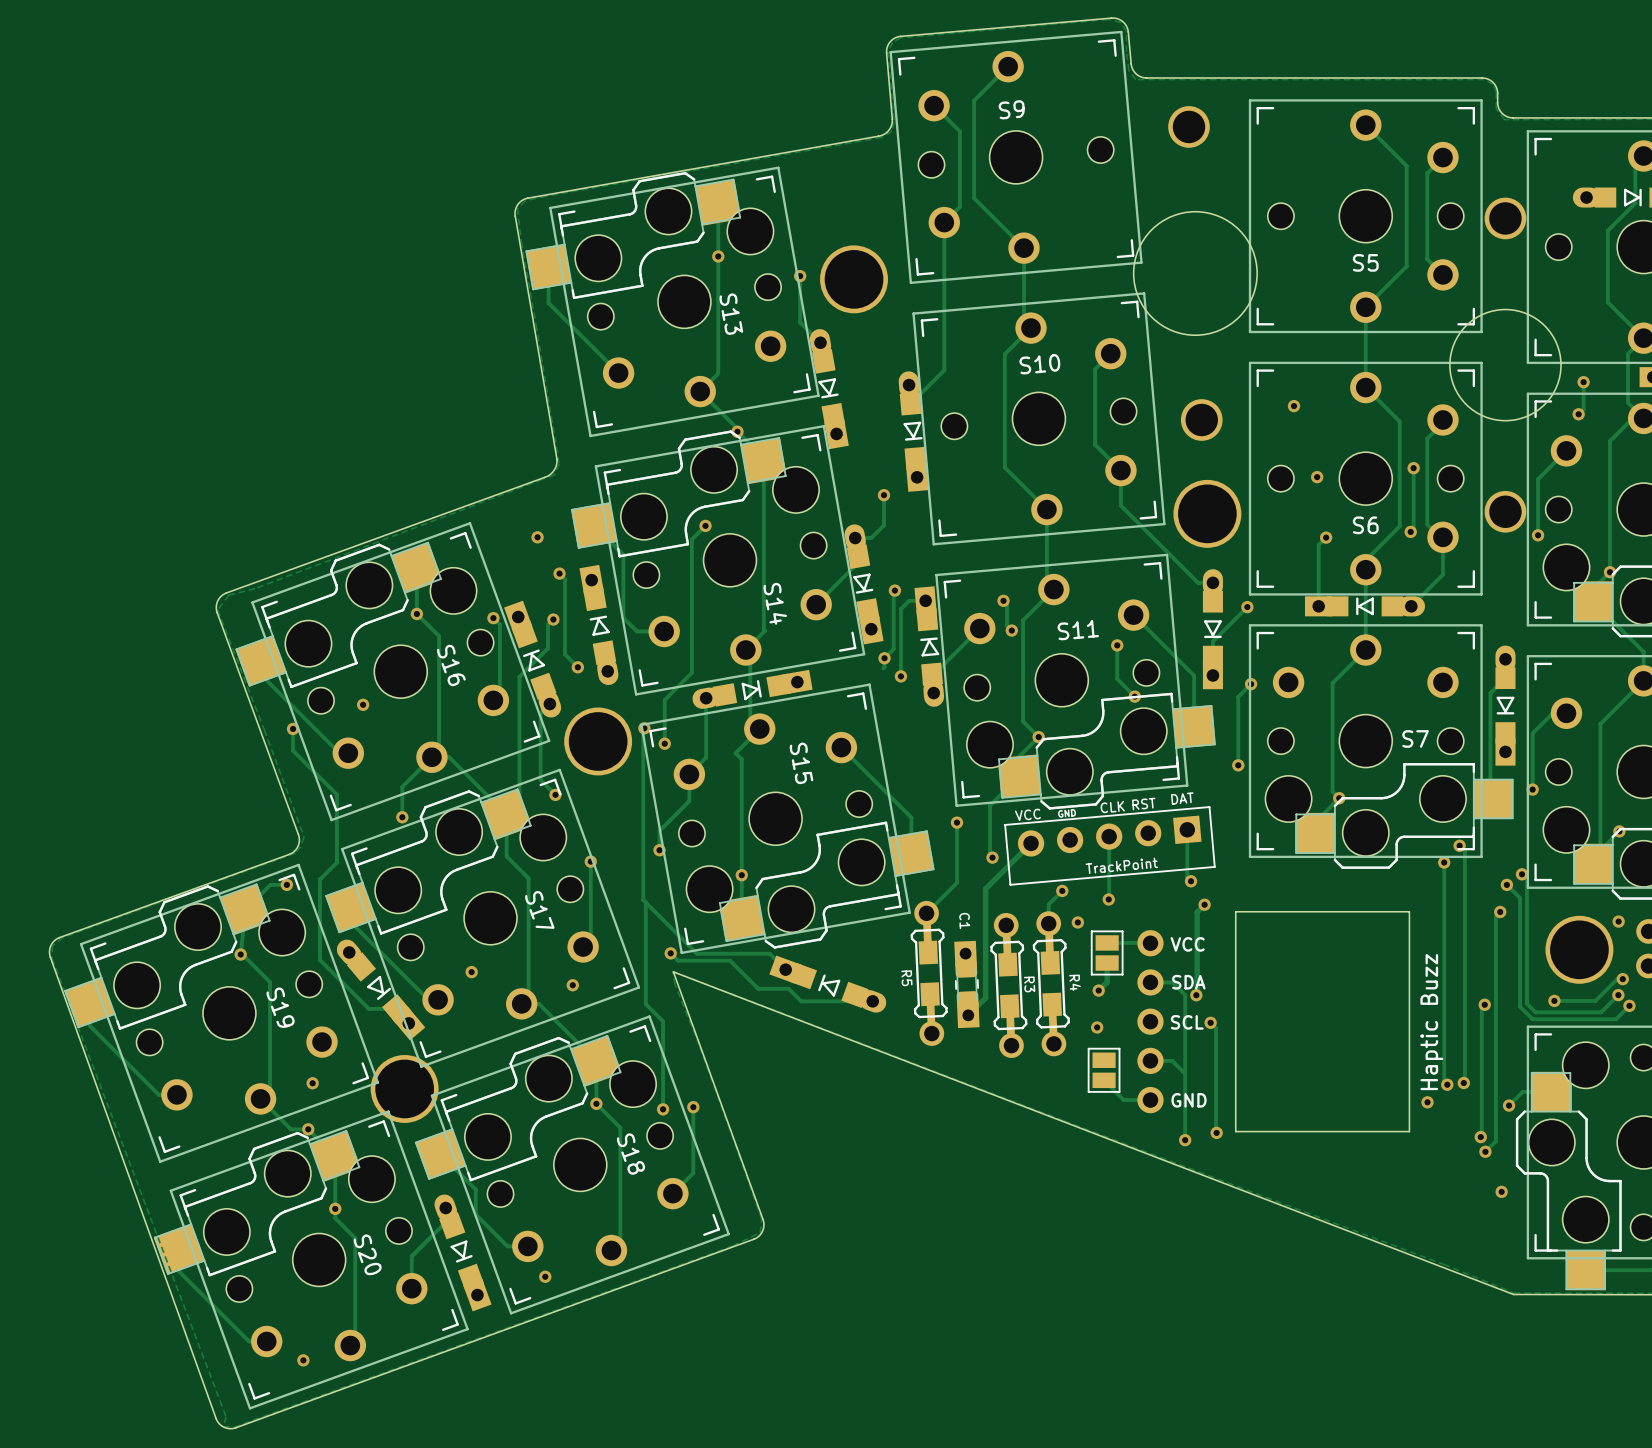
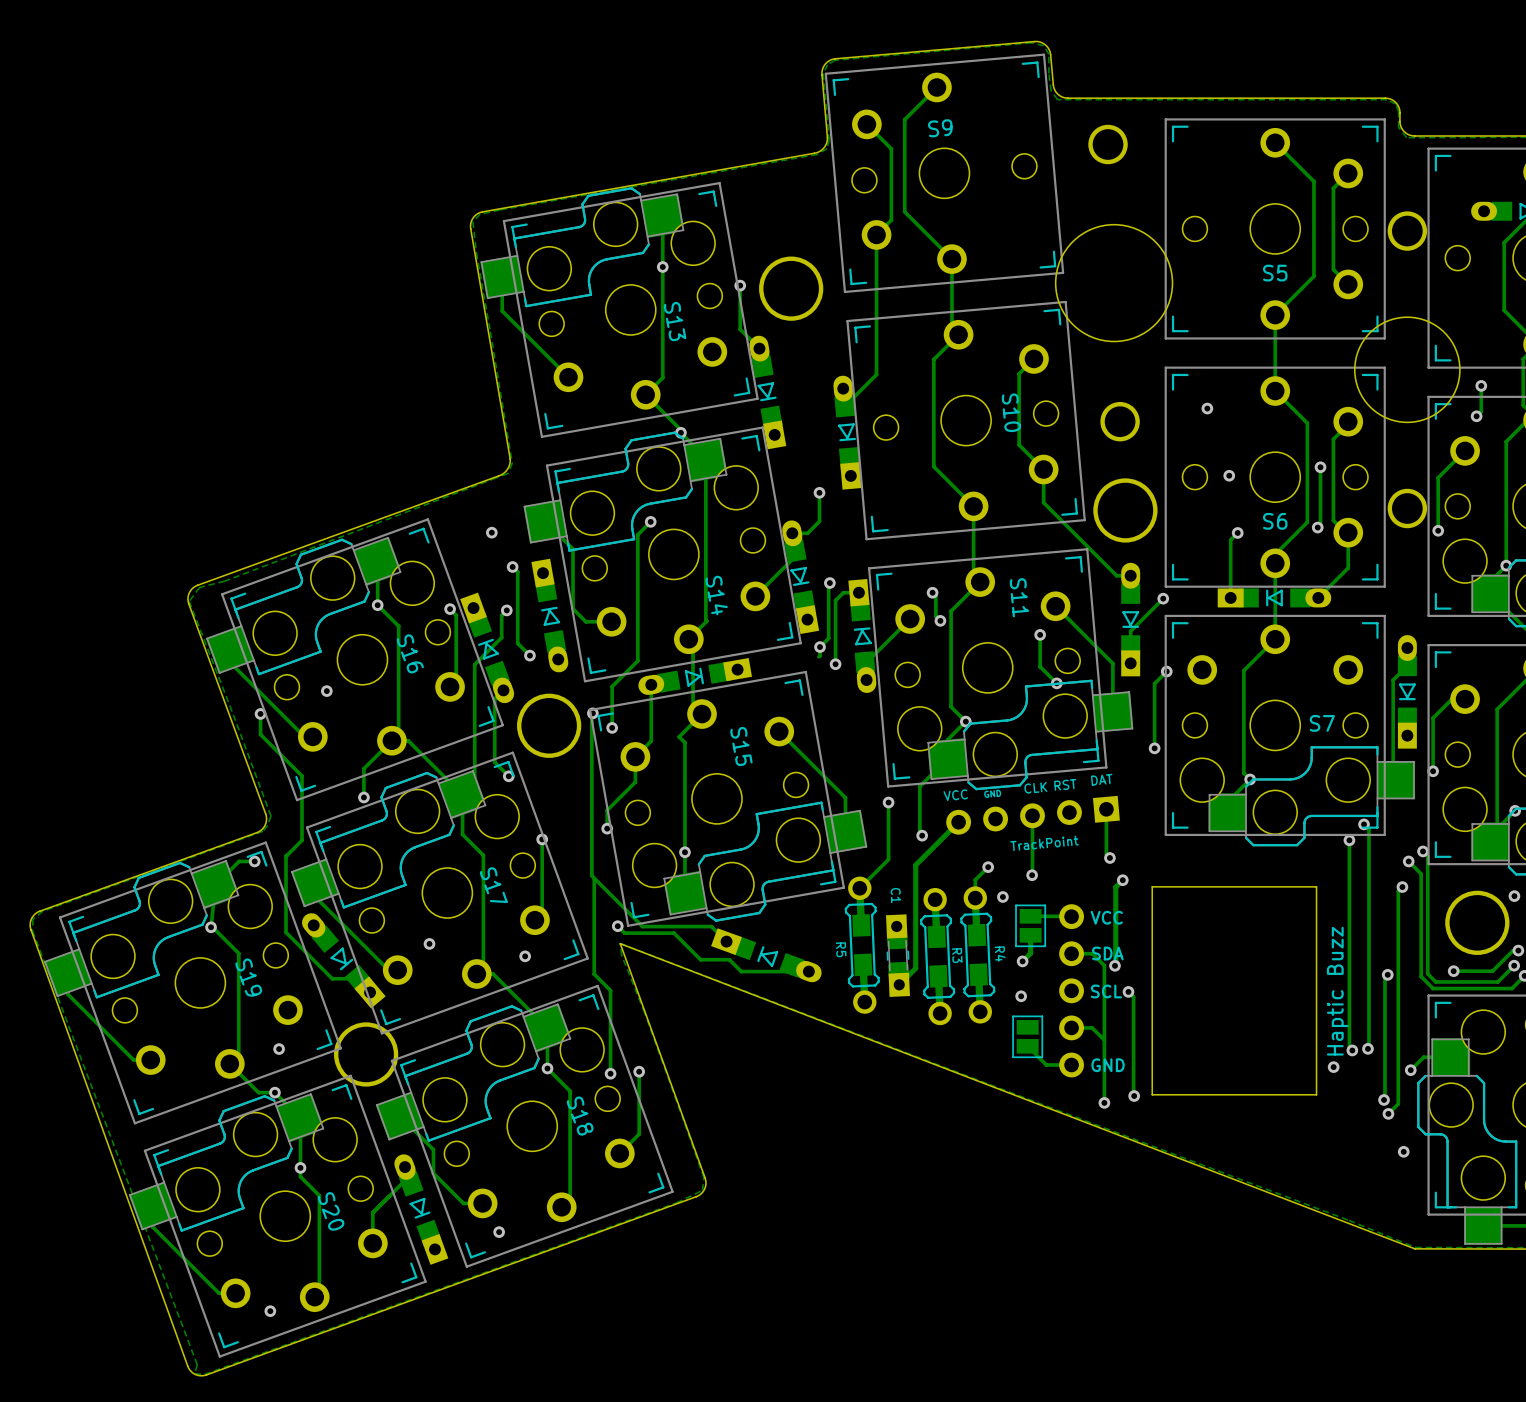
S10 name rotation: 0° (1039, 364) -> 90° clockwise (1011, 412)
S10 name position: S10 (1039, 364) -> S10 (1011, 412)
S11 name rotation: 0° (1078, 630) -> 90° clockwise (1019, 597)
line: (1209, 807) (1214, 866) (1010, 884) (1005, 824) (1209, 807) -> none

